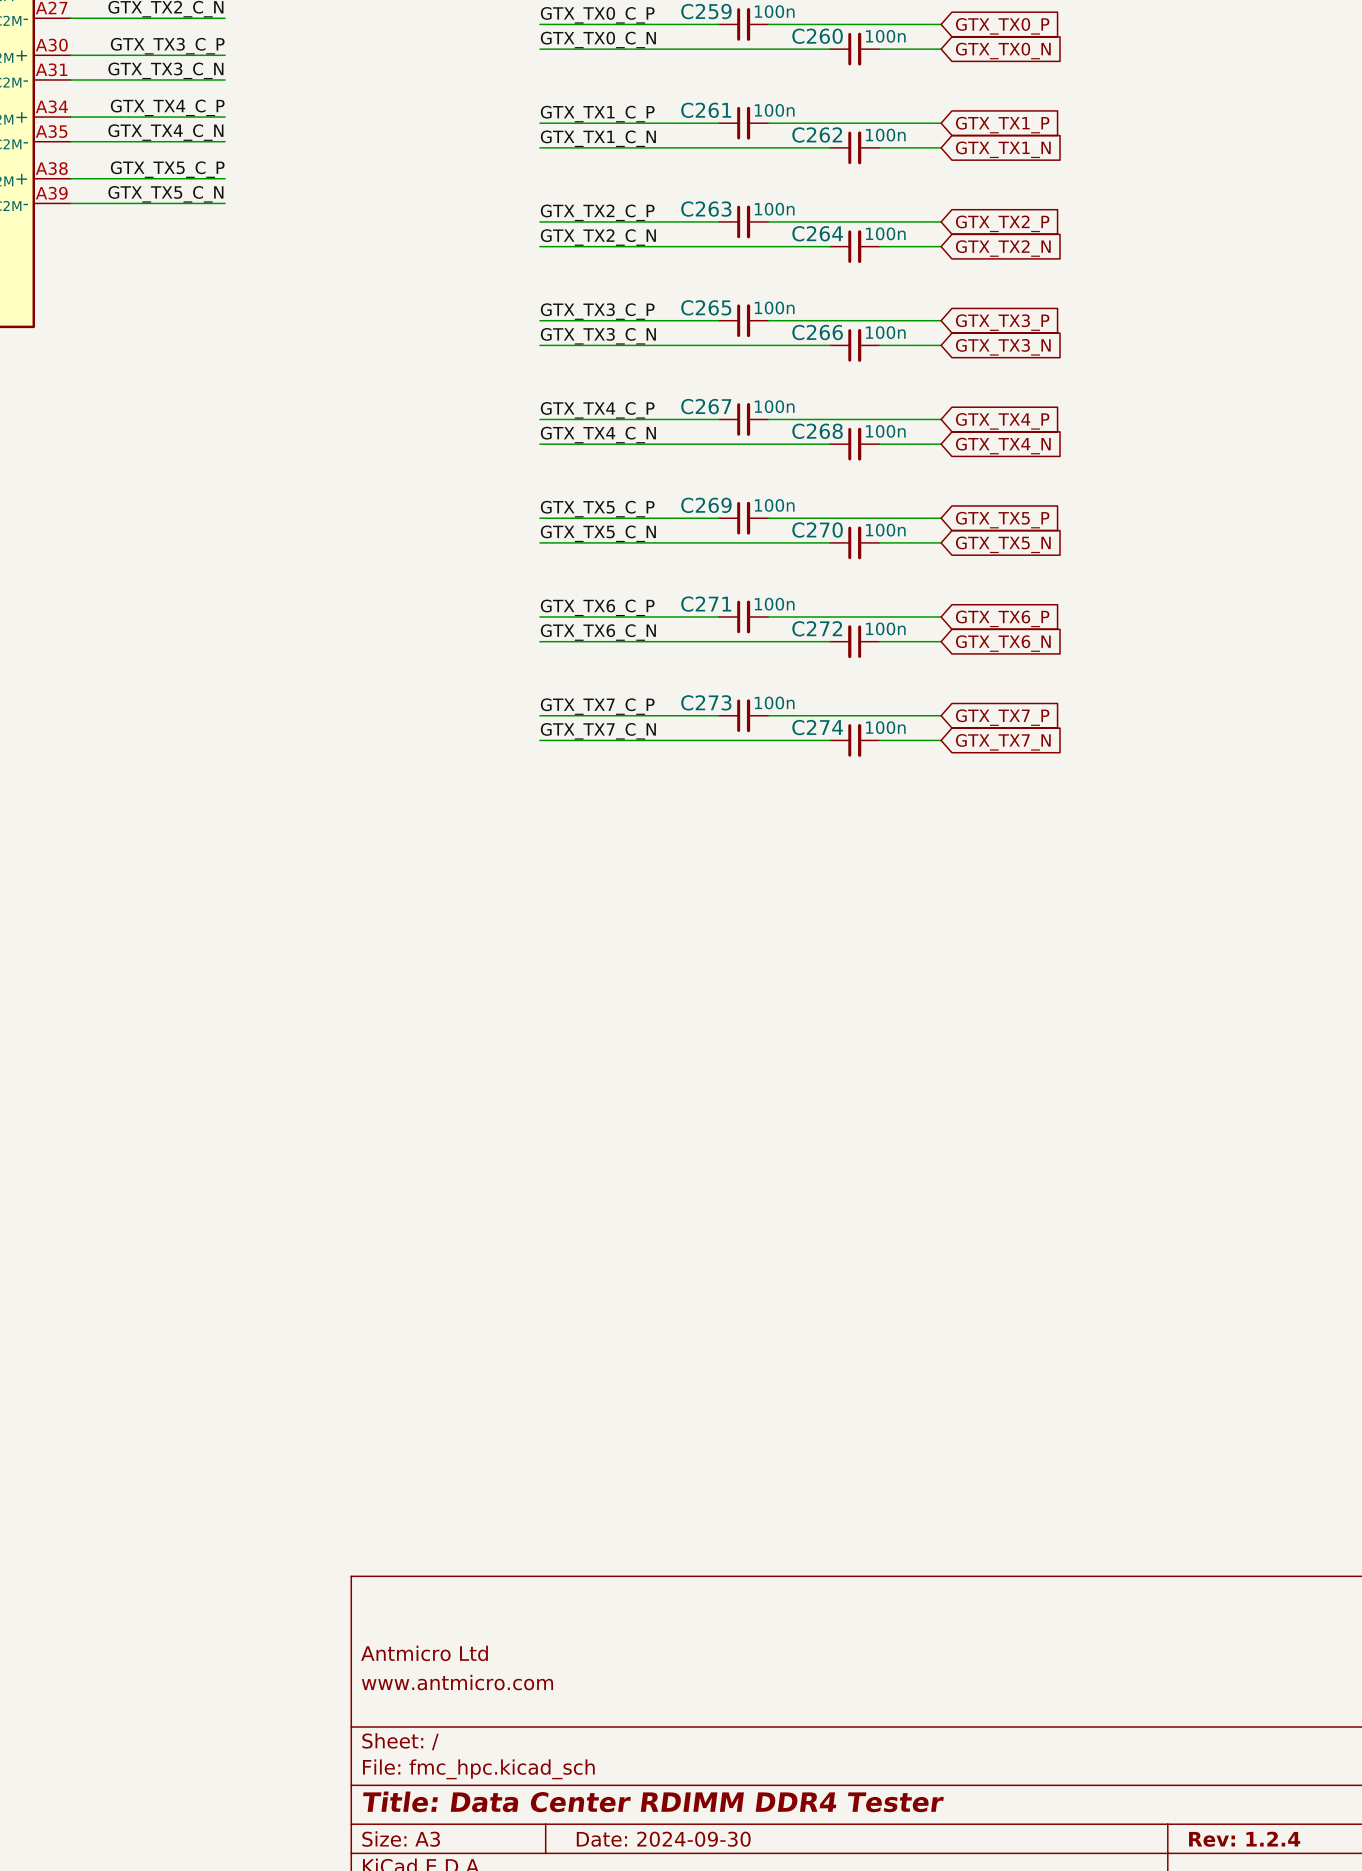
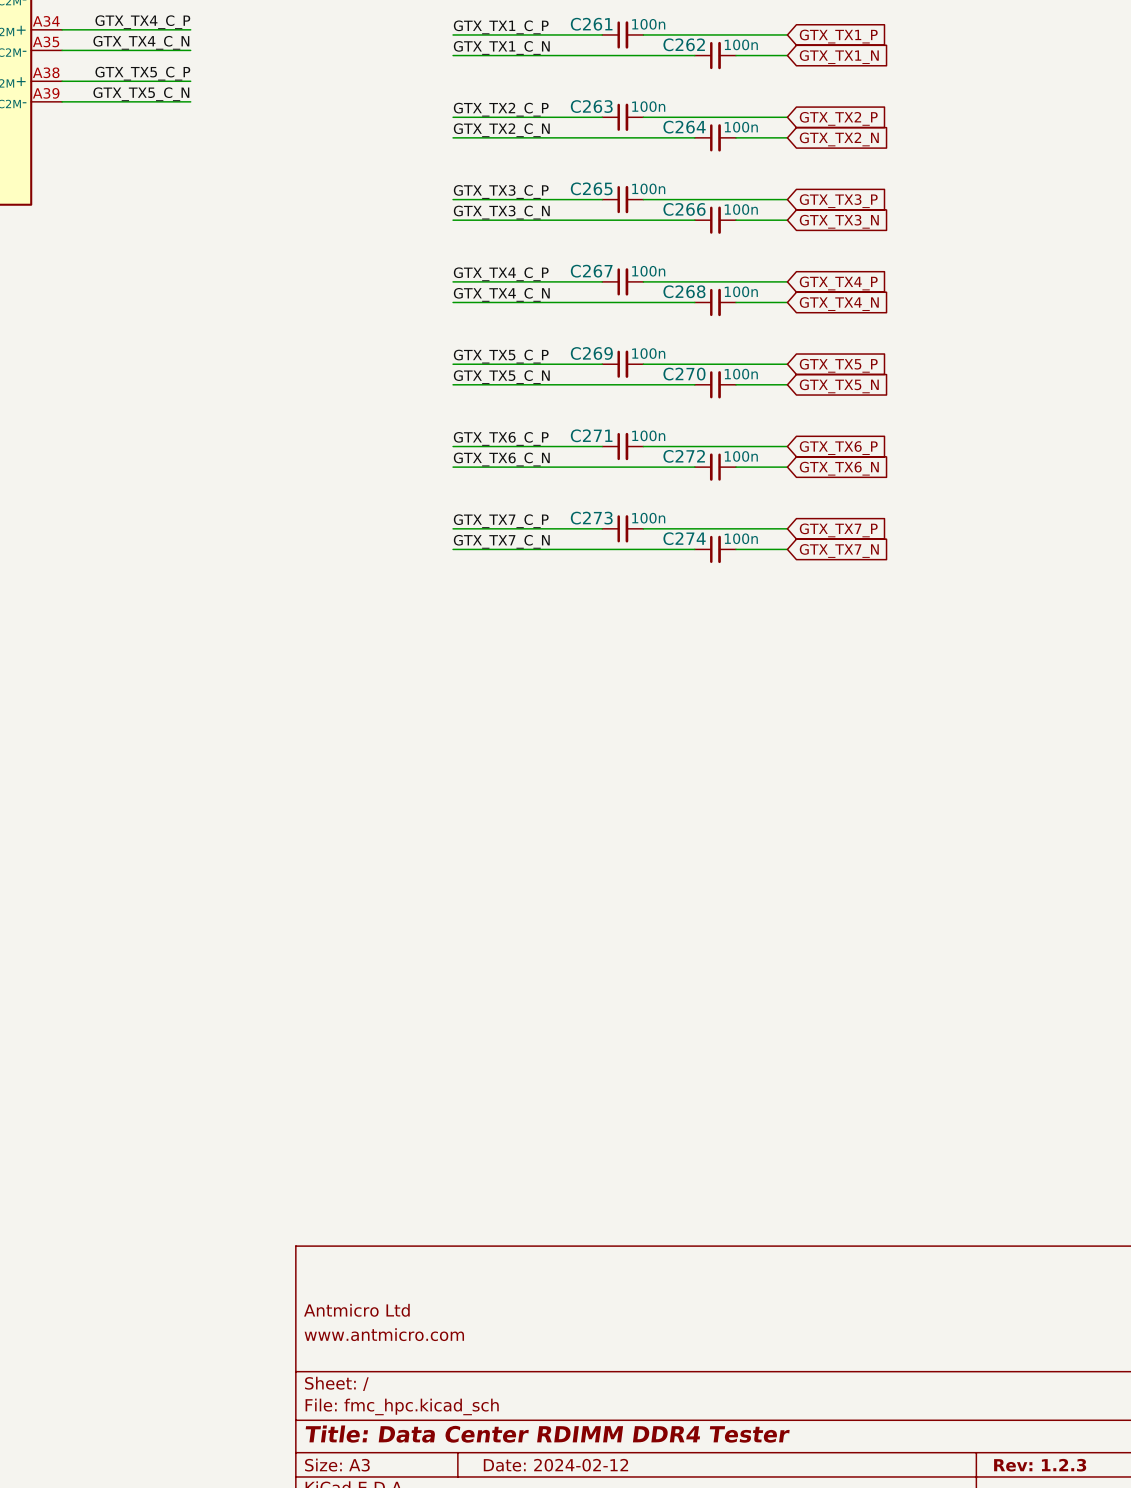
title block: Date: 2024-09-30 (663, 1839) -> Date: 2024-02-12 (555, 1465)
title block: Rev: 1.2.4 (1244, 1839) -> Rev: 1.2.3 (1040, 1465)

